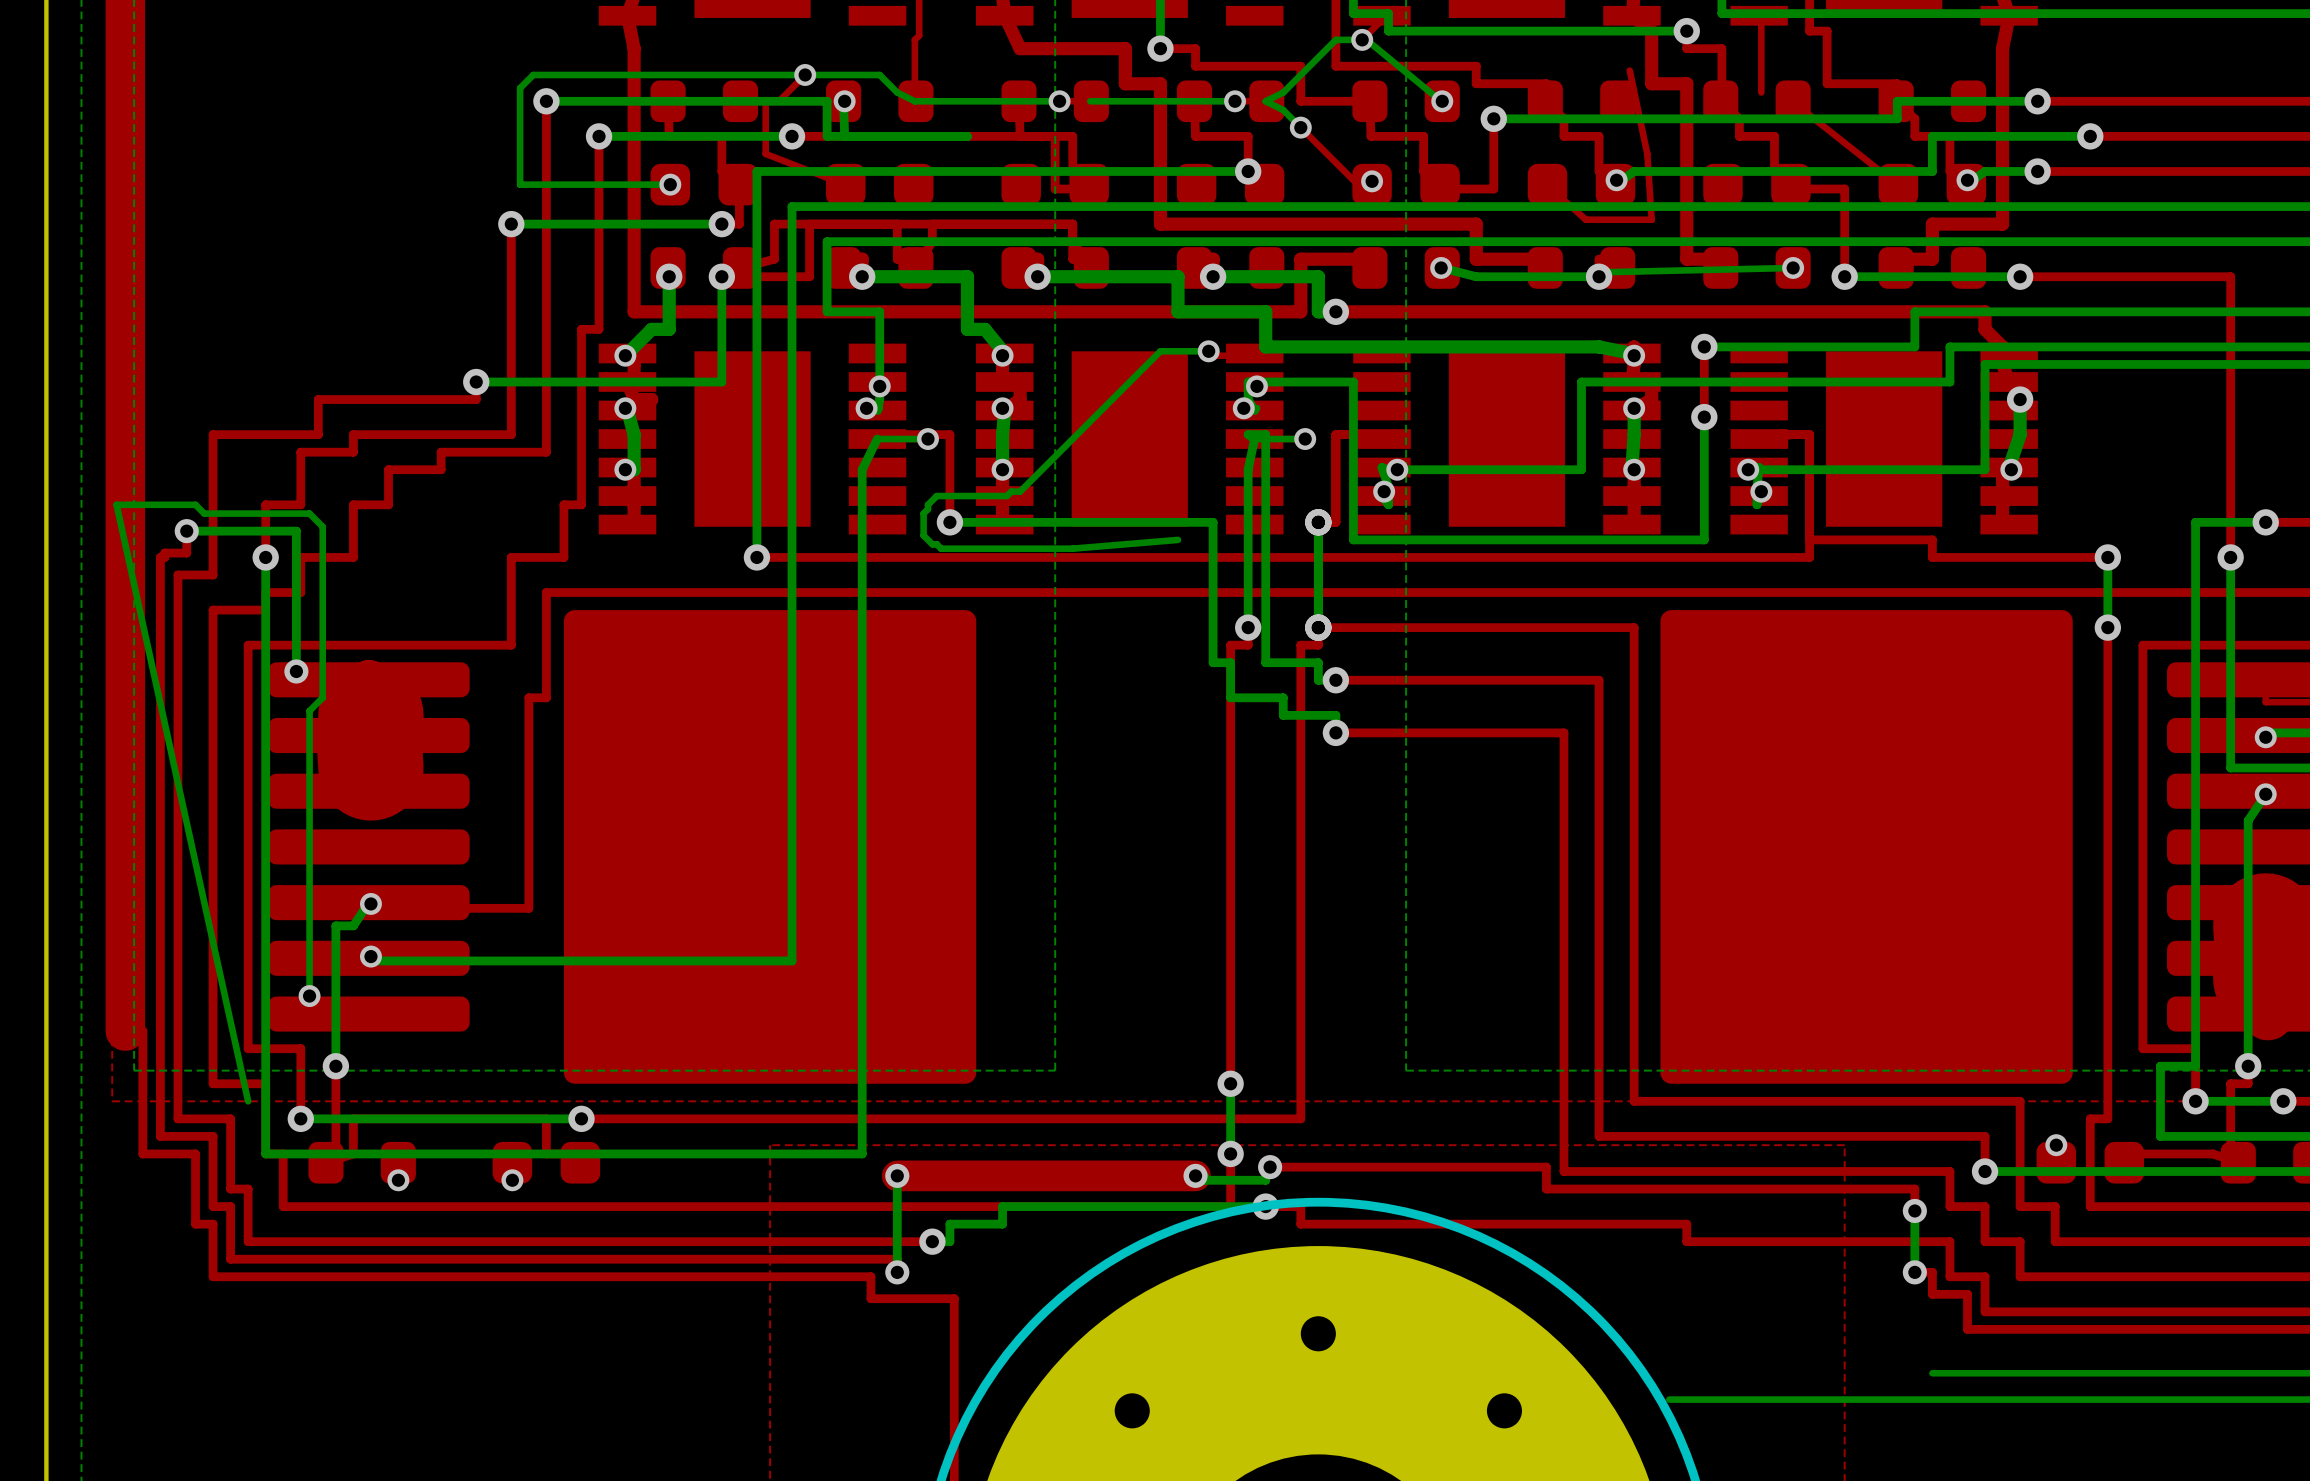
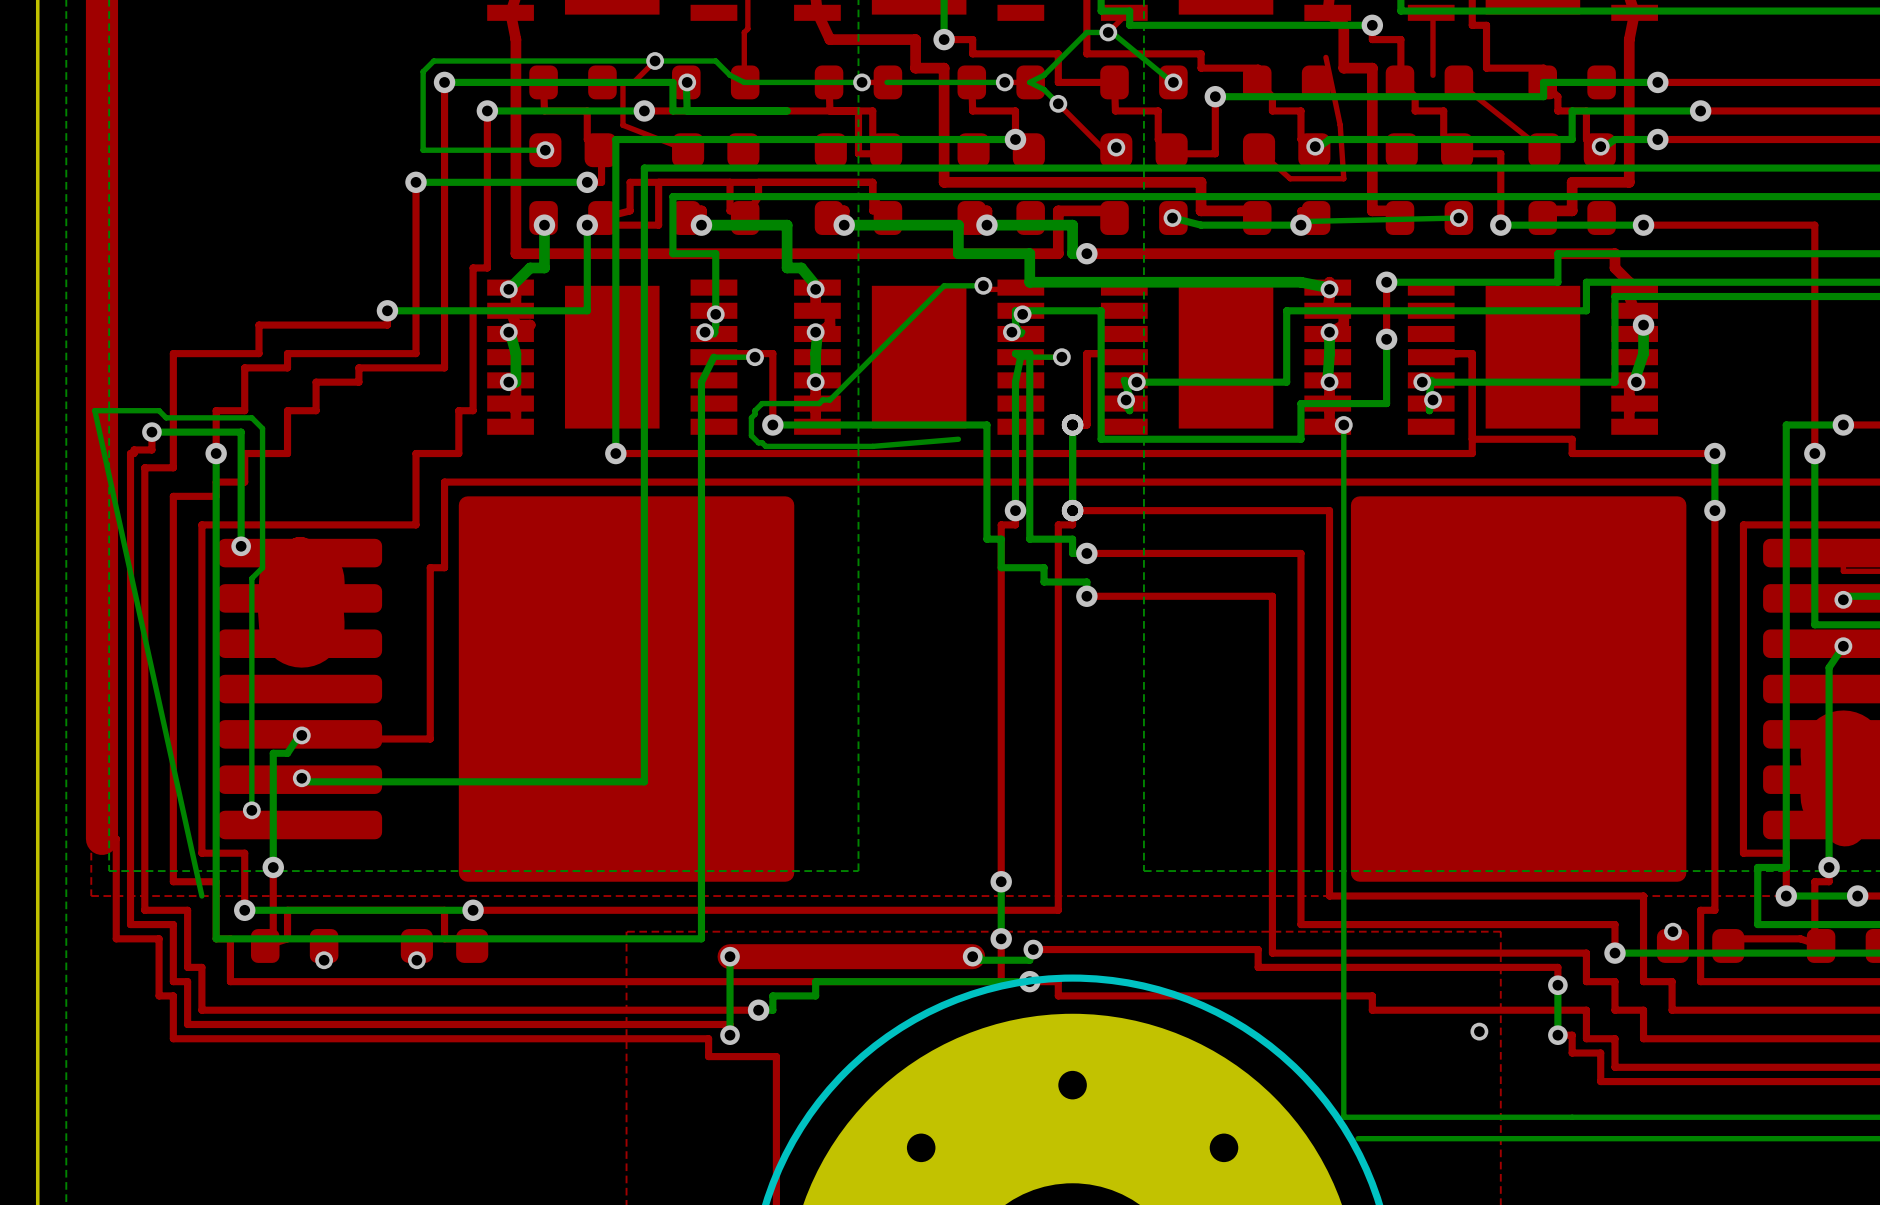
bottom track: (1704, 496) (1704, 539) (1599, 539) -> (1386, 403) (1300, 403) (1300, 439)
bottom track: none -> (1343, 424) (1343, 1117) (1572, 1117)
via: none -> (1343, 424)
via: none -> (1479, 1031)

